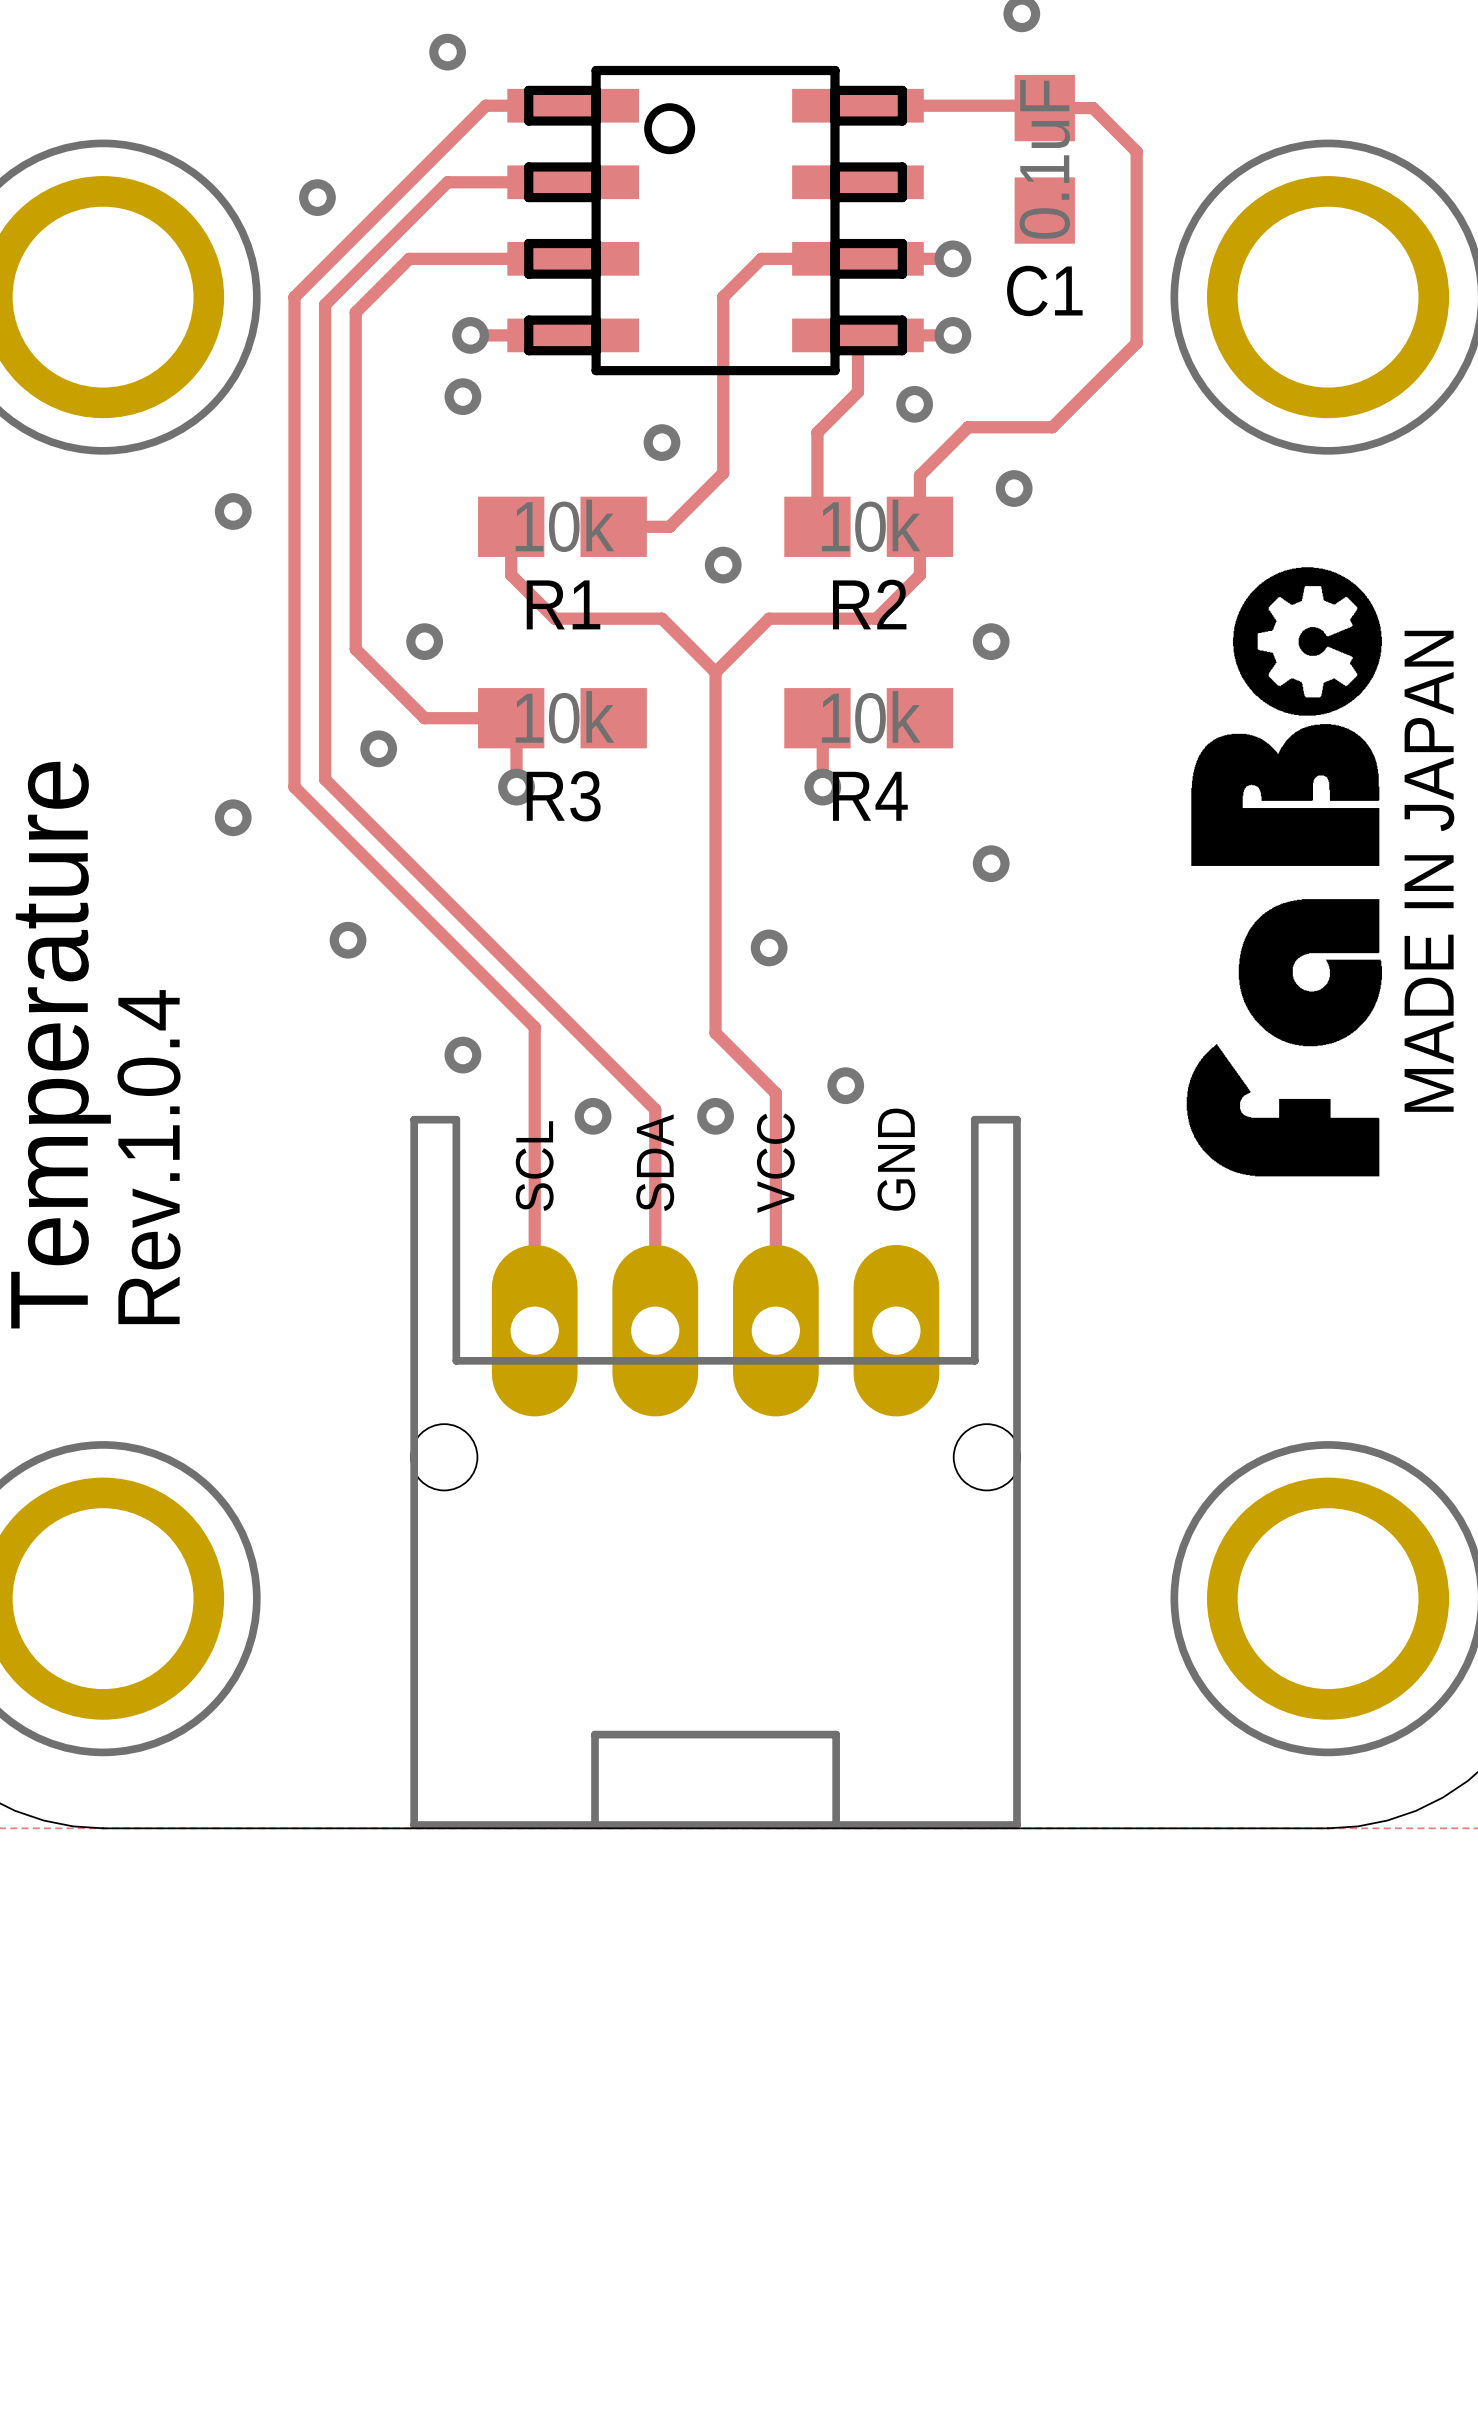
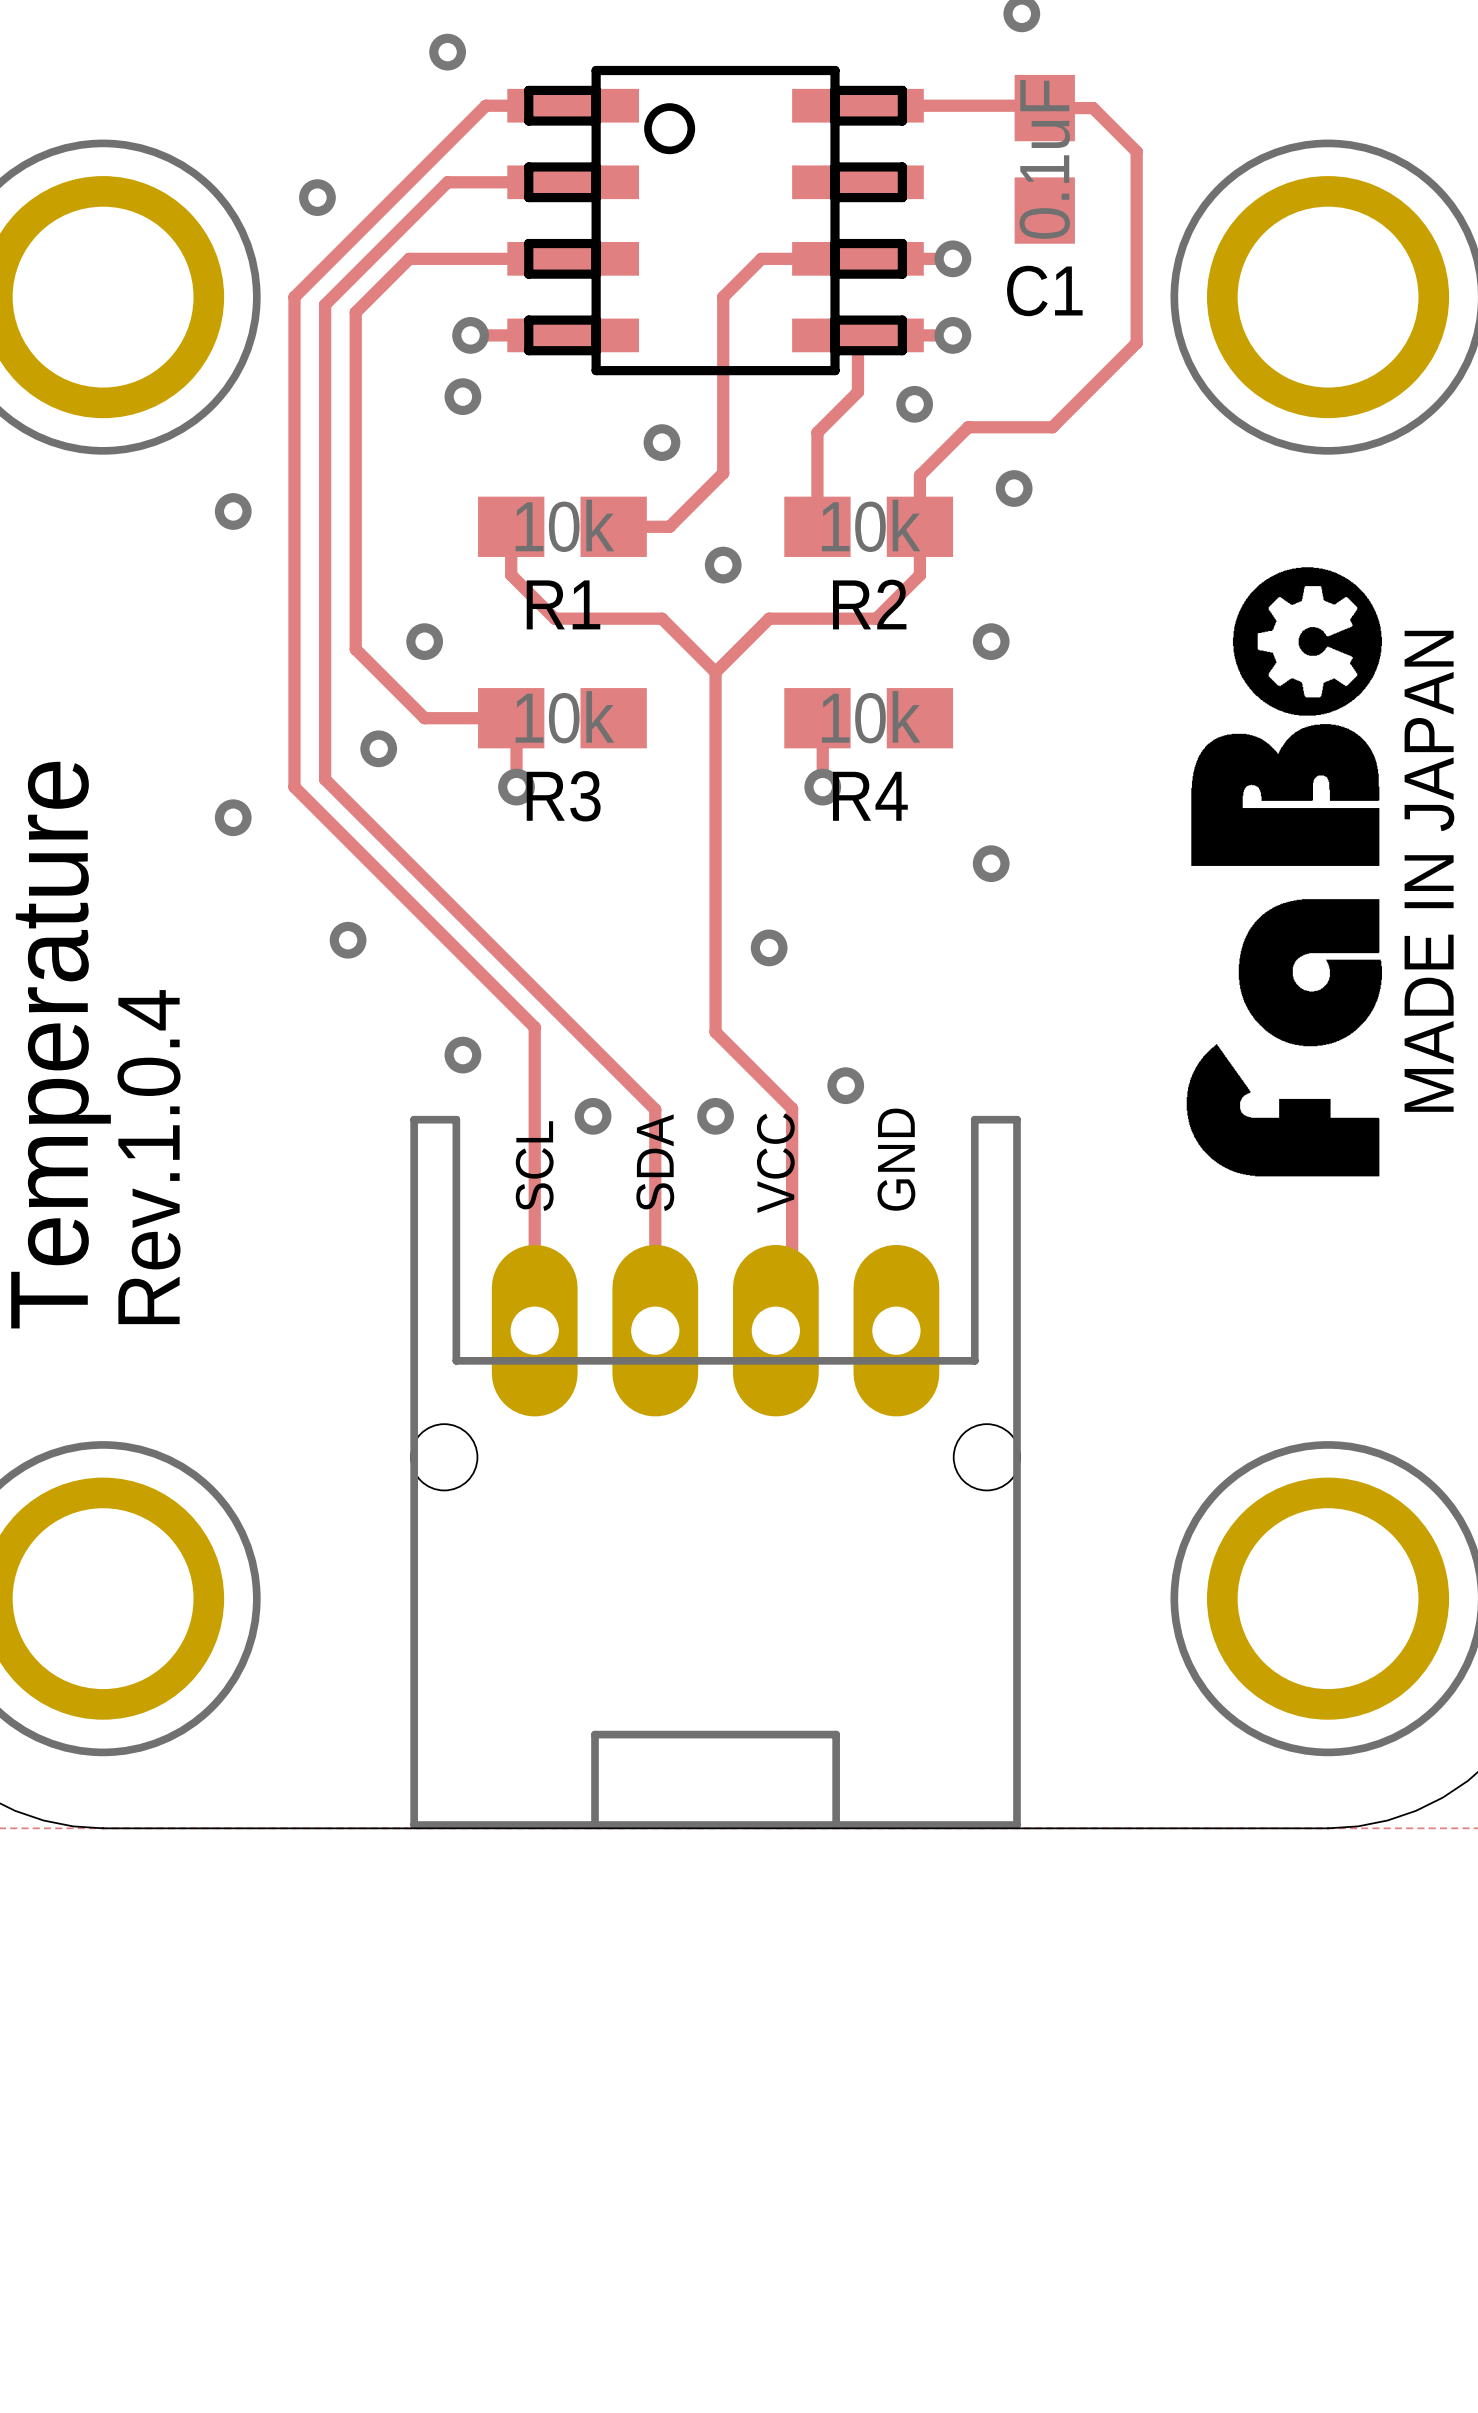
track: (715, 1033) (775, 1093) (775, 1330) -> (715, 1032) (792, 1108) (792, 1330)

